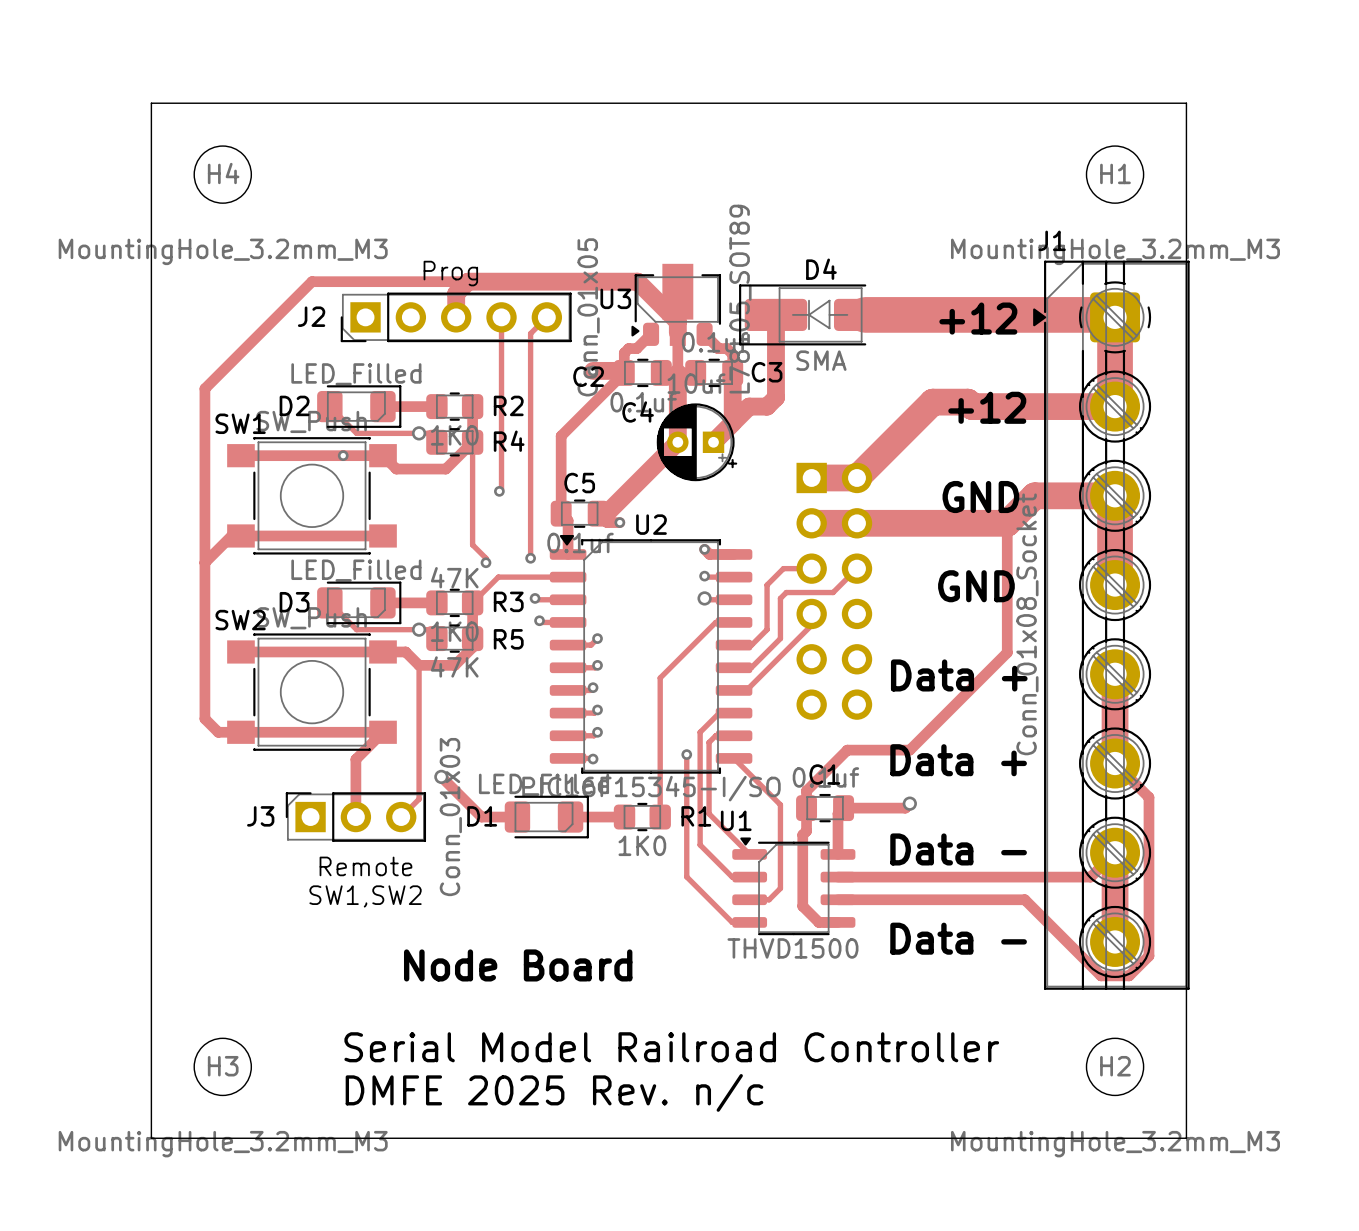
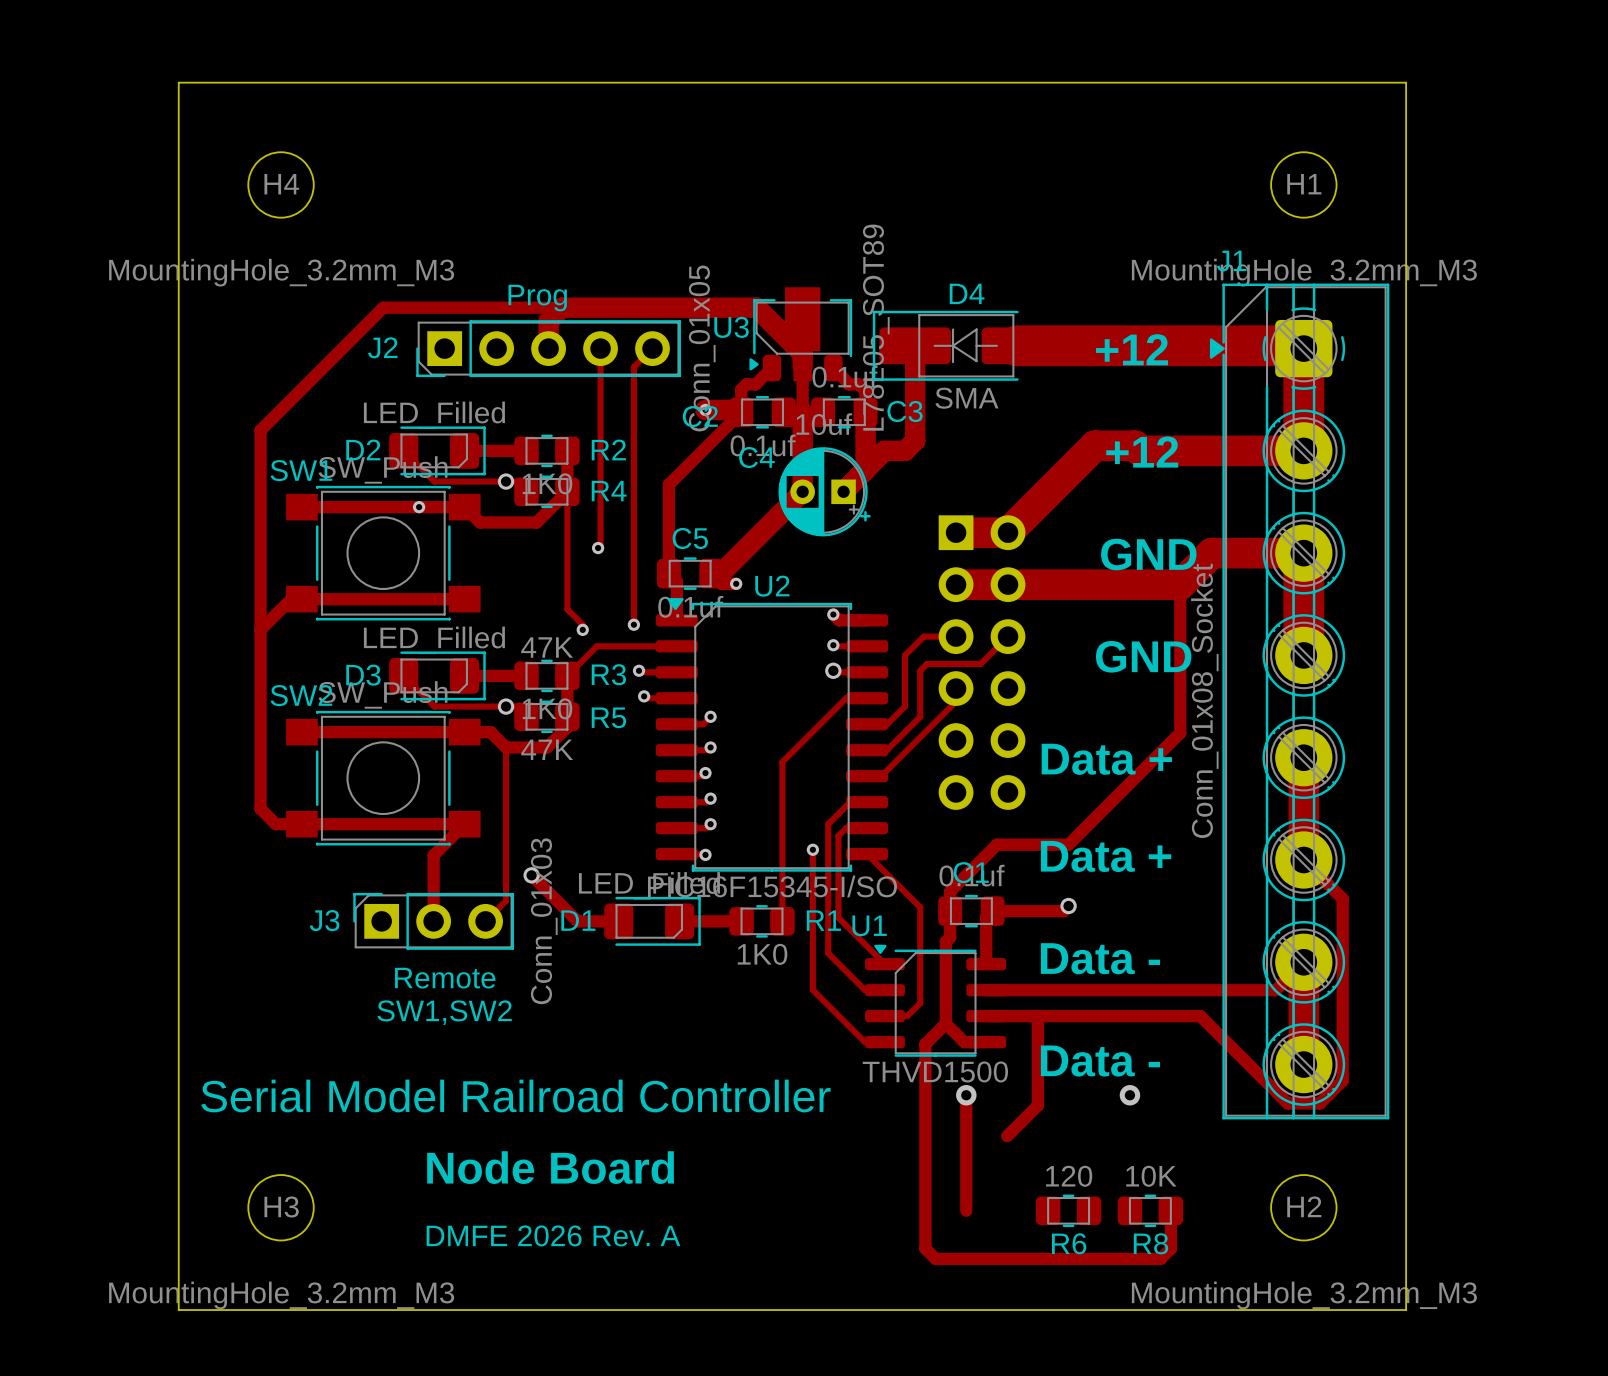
board edge: (151, 103) (1186, 103) (1186, 1138) (151, 1138) (151, 103) -> (178, 82) (178, 1310) (1406, 1310) (1406, 82) (178, 82)
track: none -> (1037, 1016) (1037, 1105) (1007, 1136)
track: none -> (945, 1023) (925, 1044) (925, 1248) (935, 1258) (1160, 1258) (1170, 1248) (1170, 1210)
text position: Node Board (518, 965) -> Node Board (550, 1167)
track: none -> (966, 1095) (966, 1210)
via: none -> (966, 1095)
via: none -> (1129, 1095)
text position: Serial Model Railroad Controller (671, 1047) -> Serial Model Railroad Controller (515, 1096)
R6: none -> 120 (1068, 1210)
R8: none -> 10K (1150, 1210)
text: DMFE 2025 Rev. n/c (554, 1092) -> DMFE 2026 Rev. A (553, 1235)

